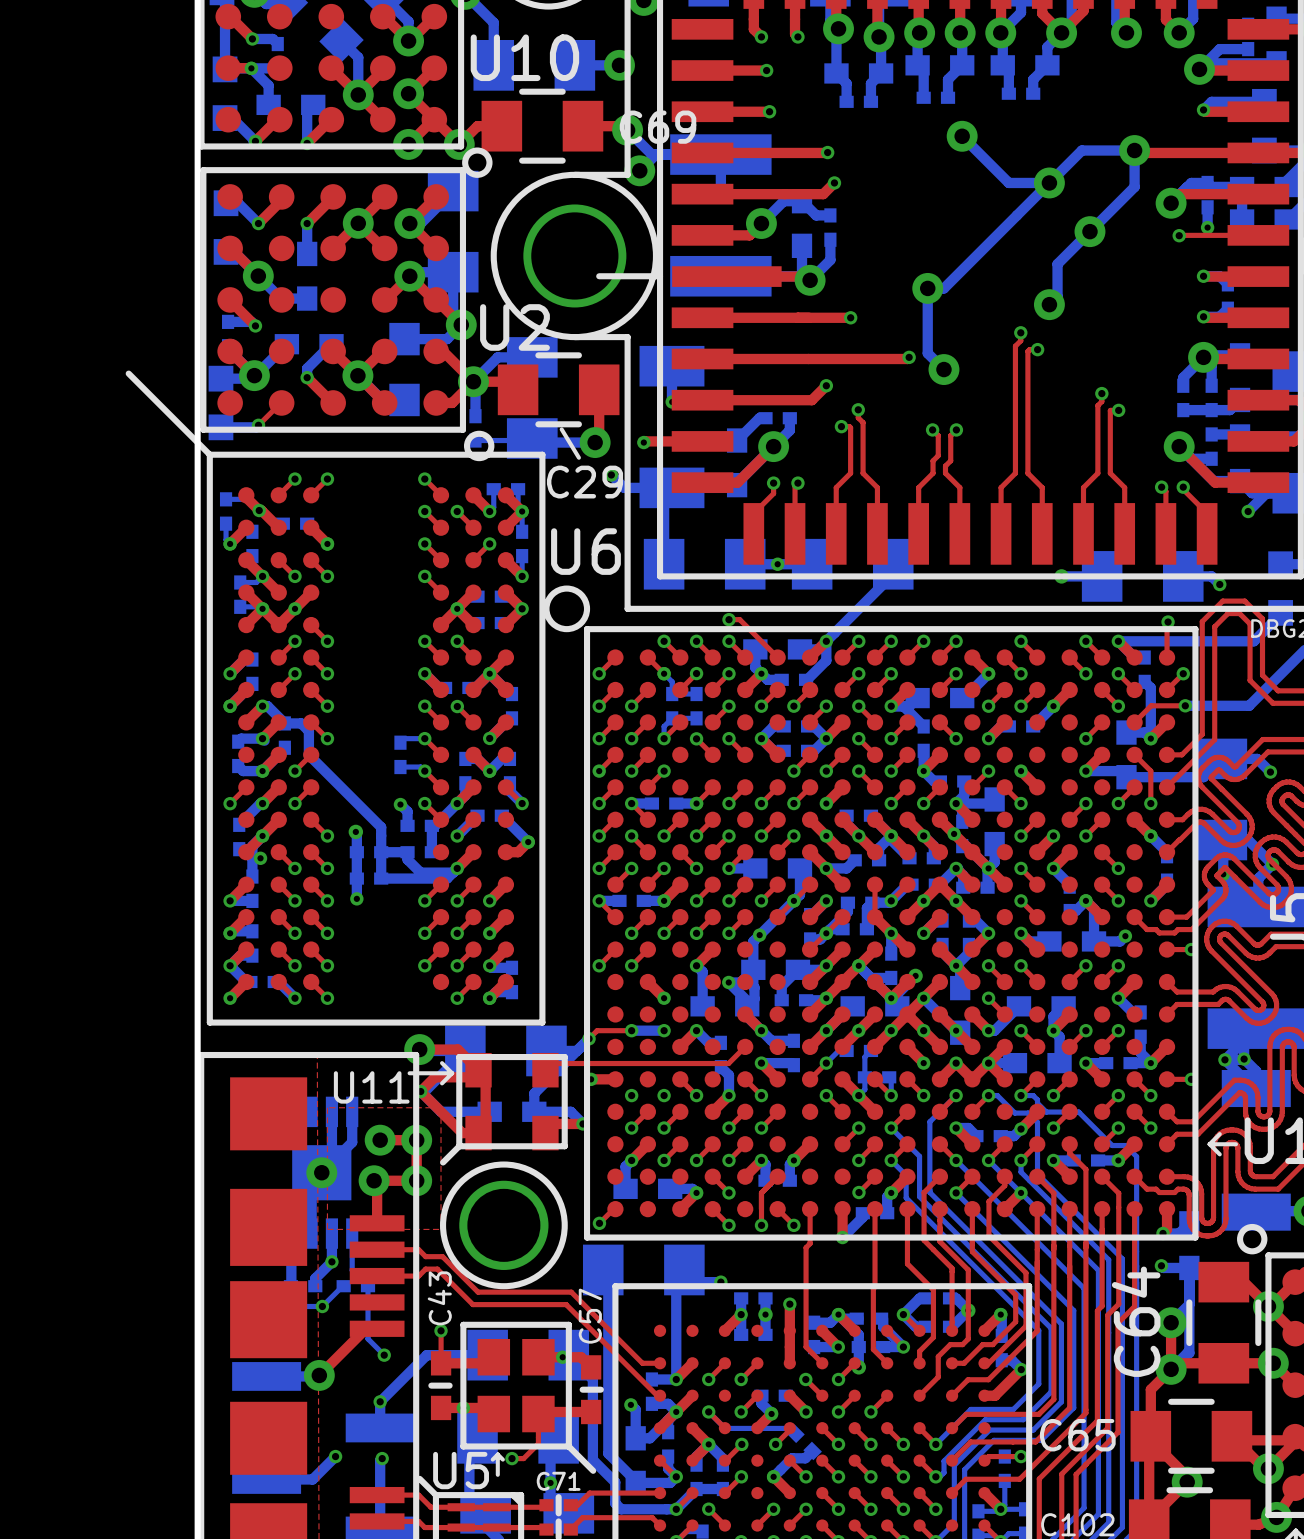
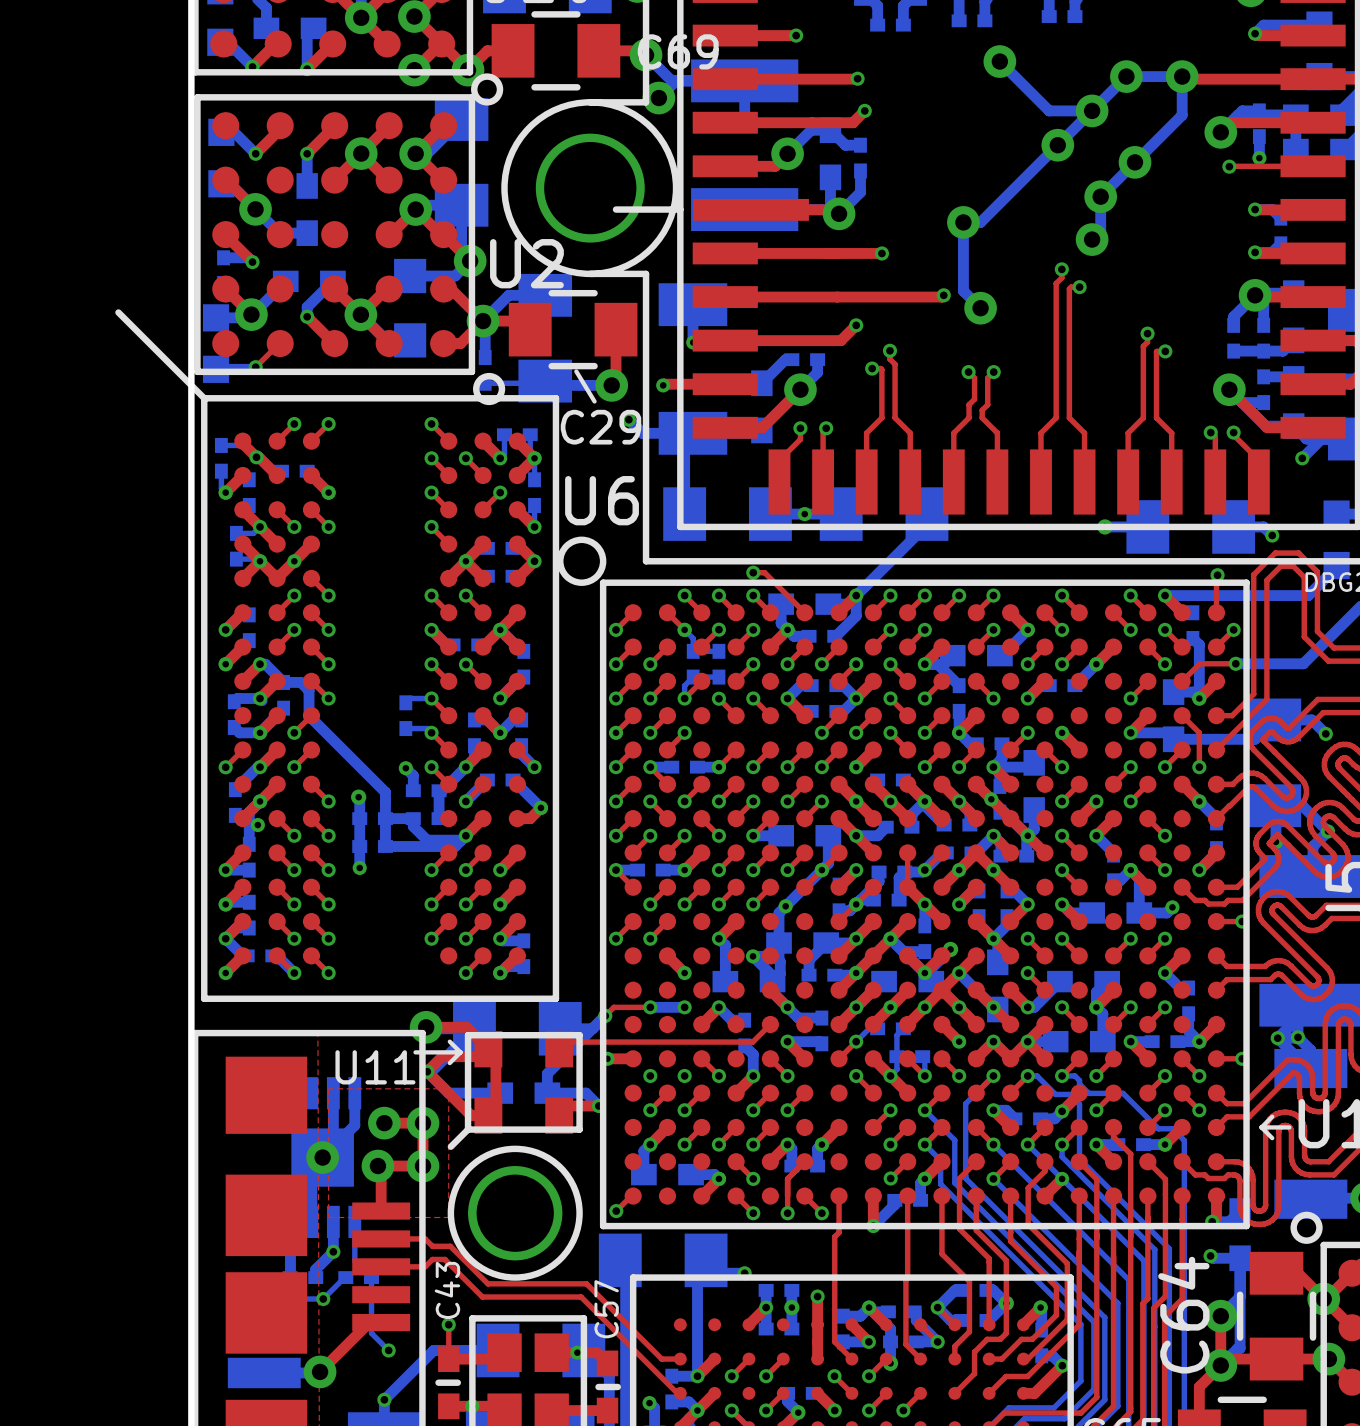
via: none -> (1126, 76)
via: none -> (1057, 145)
via: none -> (1100, 196)

